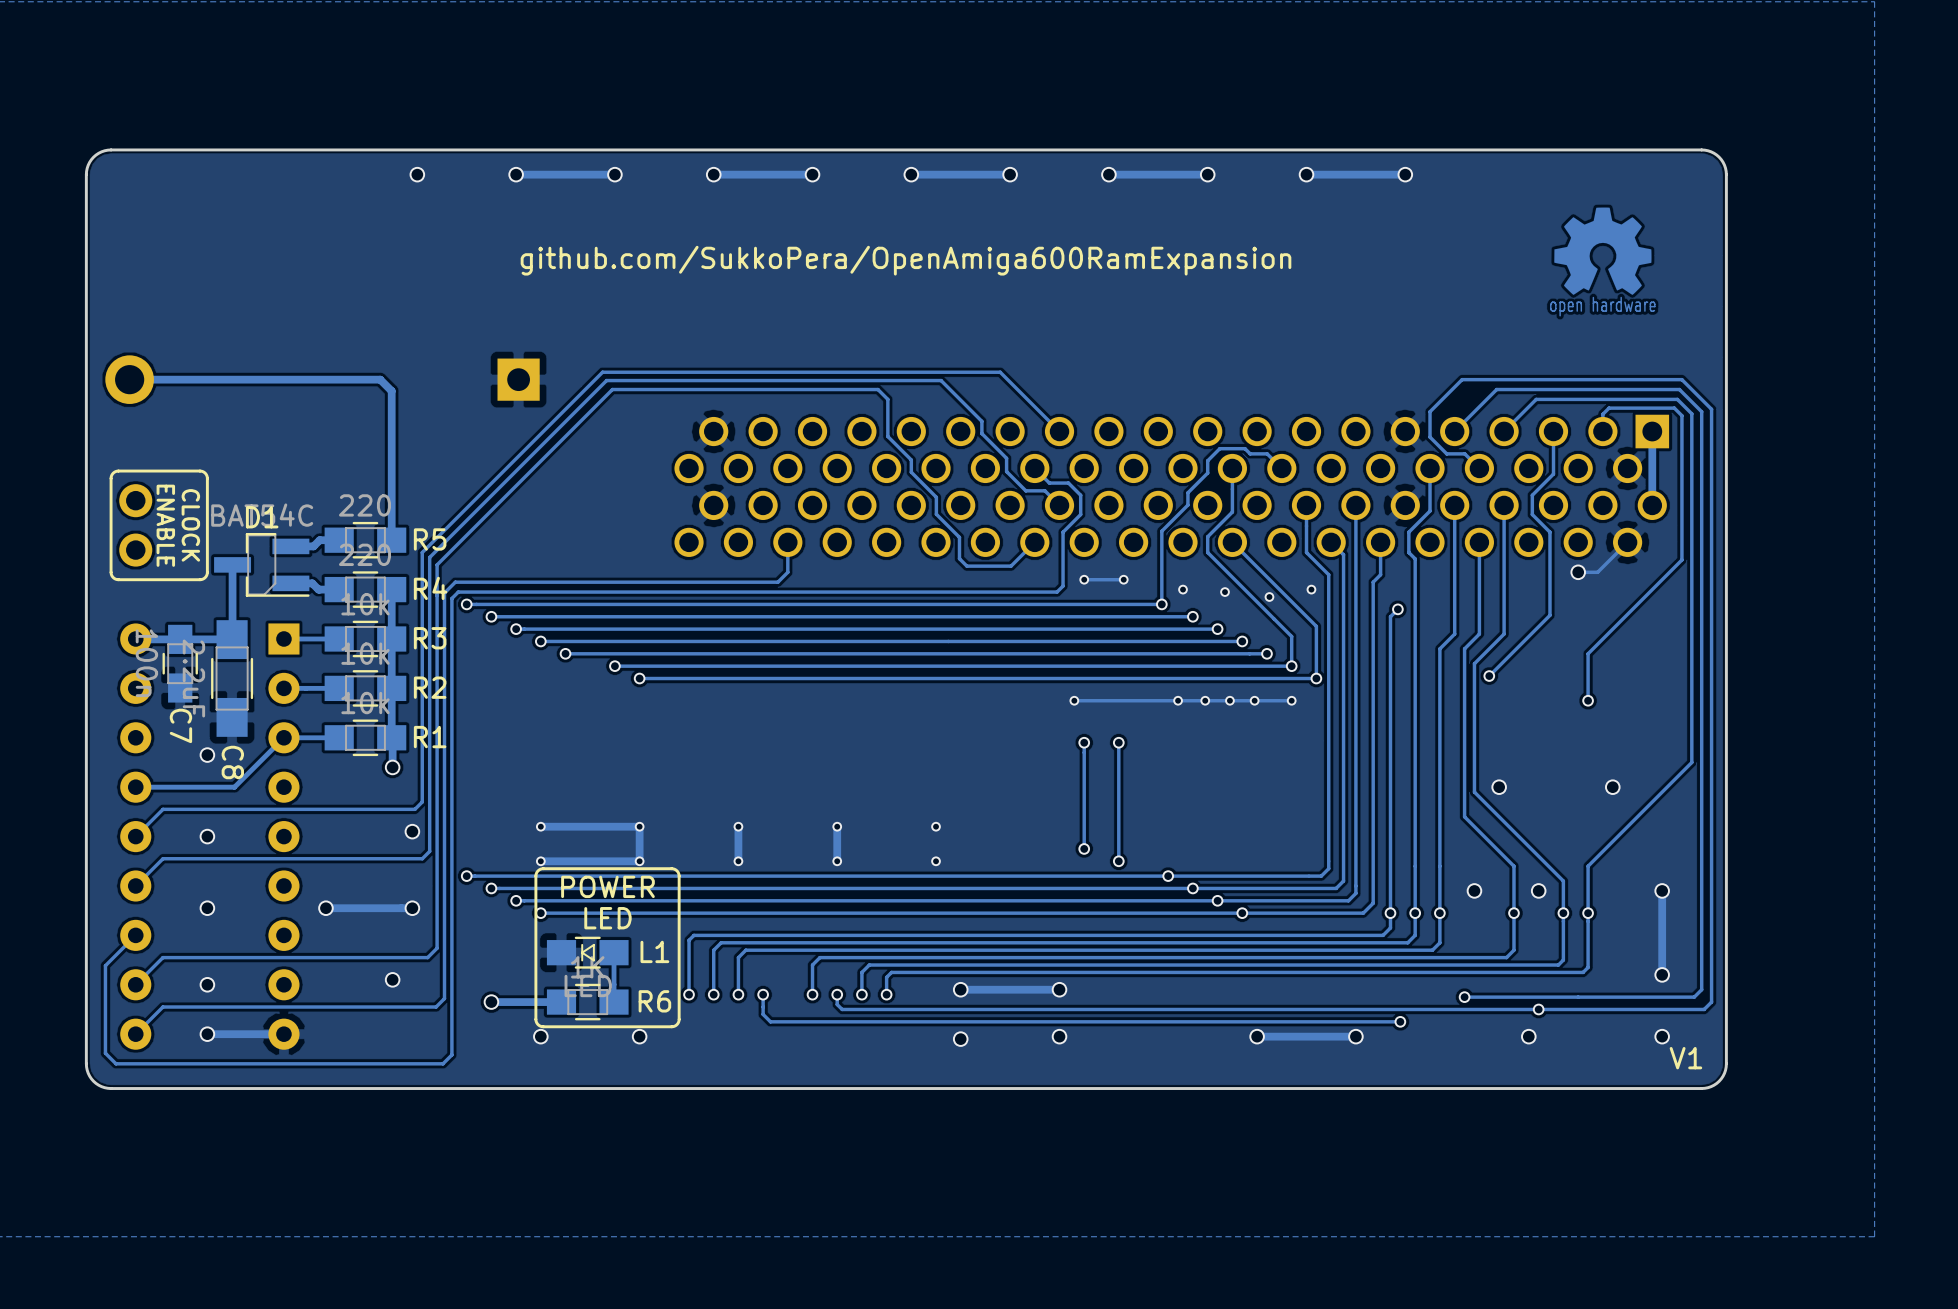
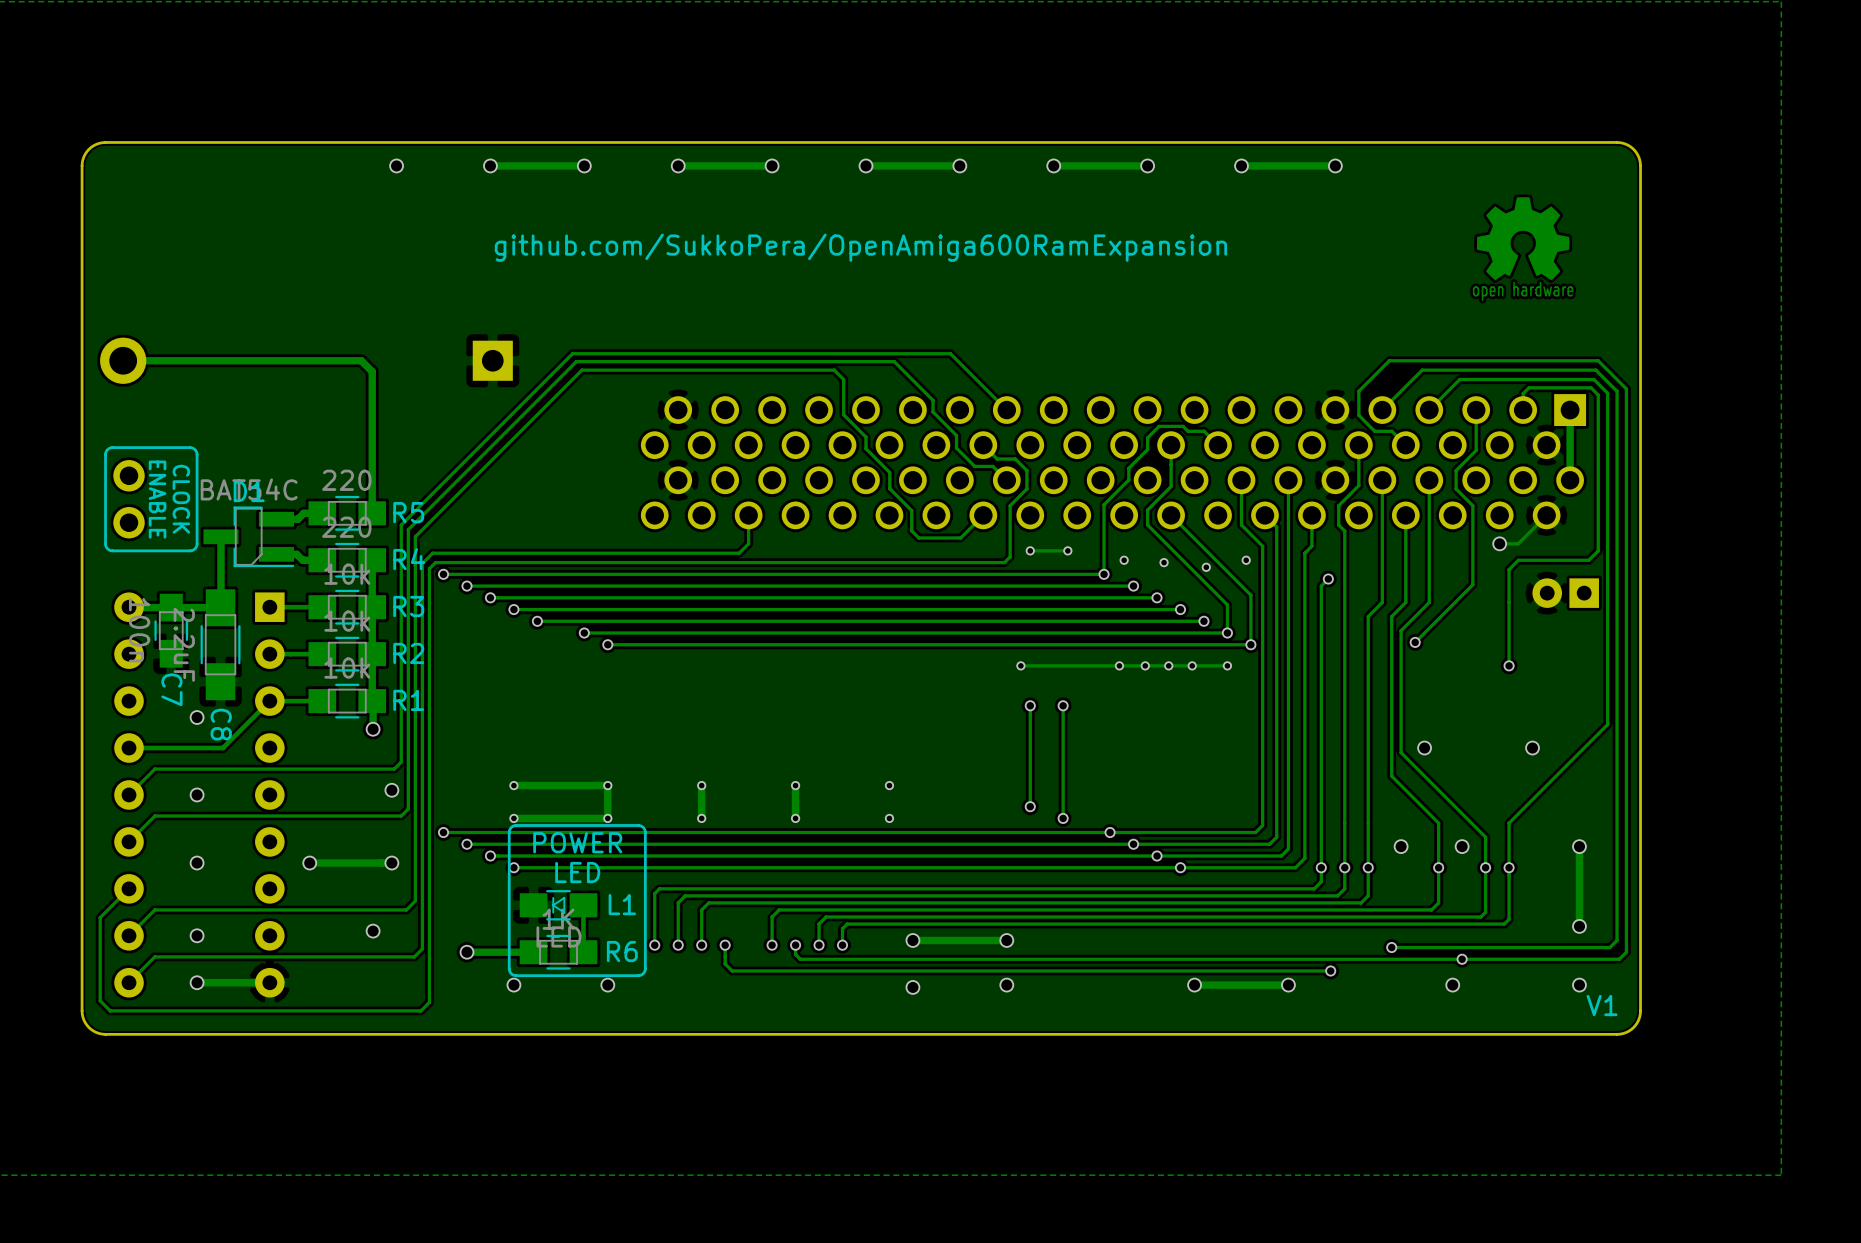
track: (1681, 559) (1588, 653) -> (1598, 532) (1598, 550) (1588, 560) (1518, 560) (1509, 569) (1509, 621)
part: none -> (1565, 593)

